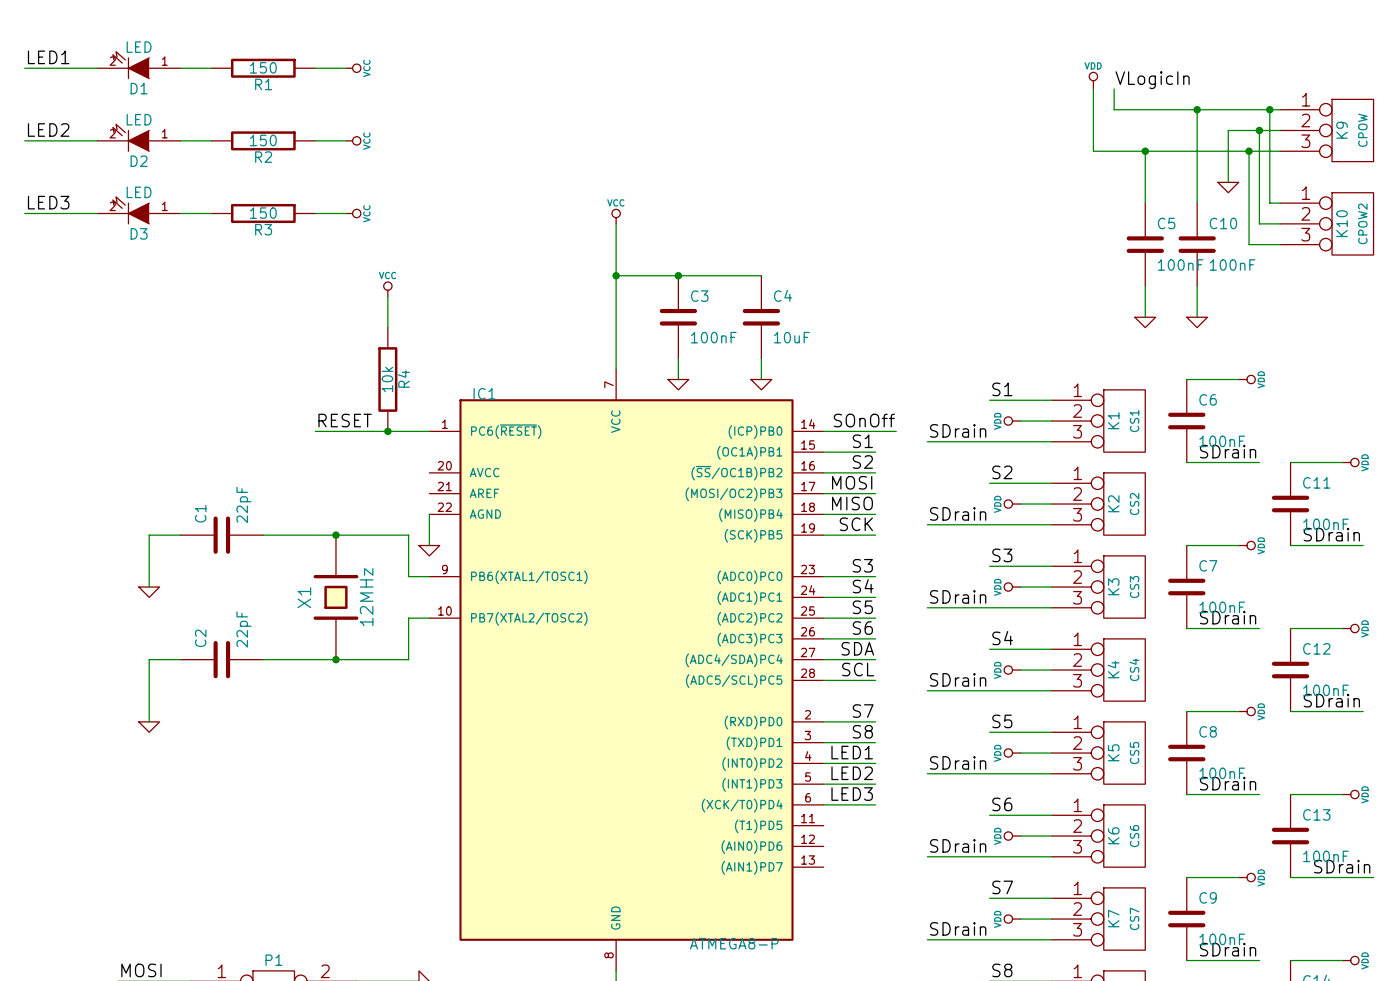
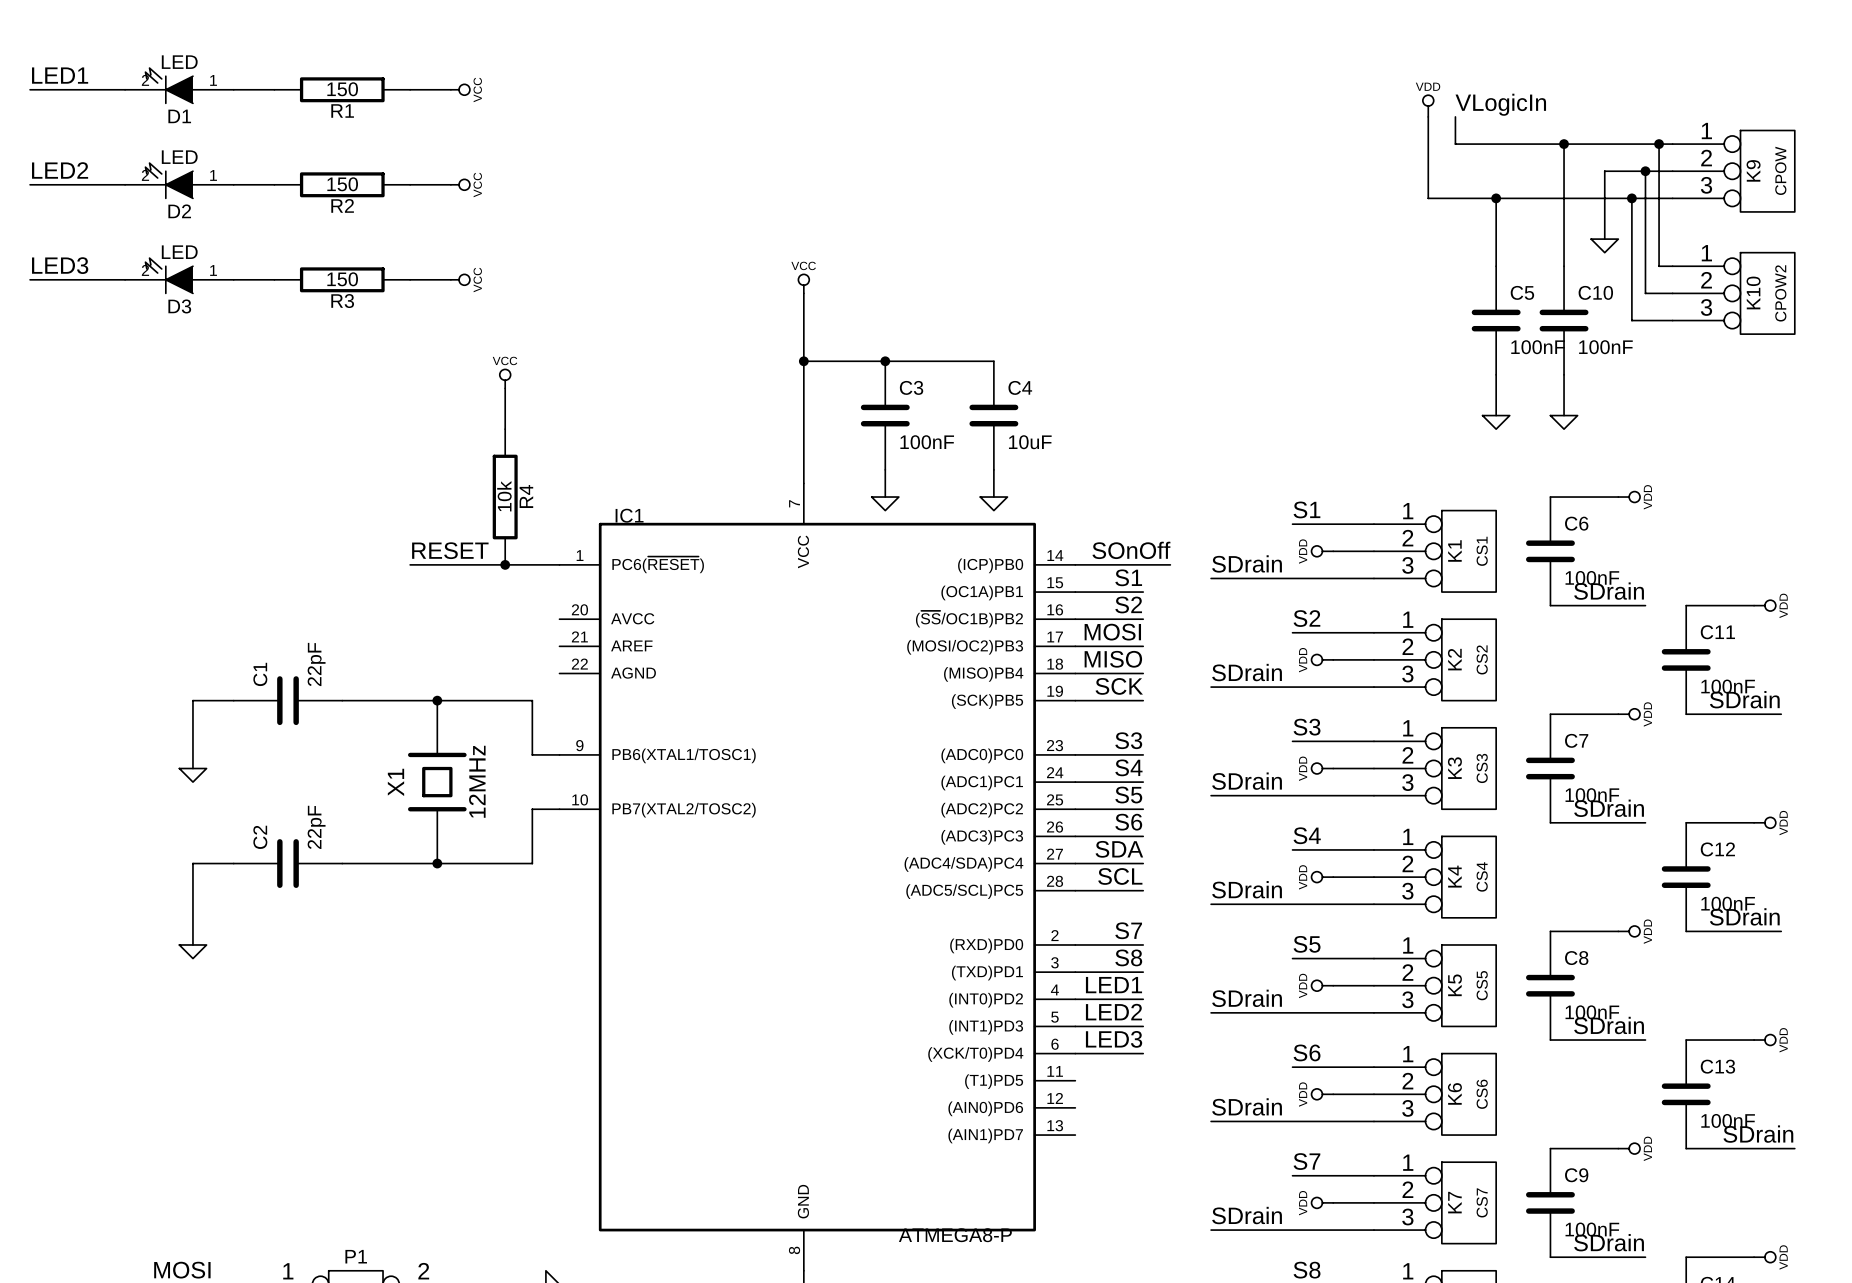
wire: (429, 514) (429, 545) -> none
power symbol: (429, 550) -> none

